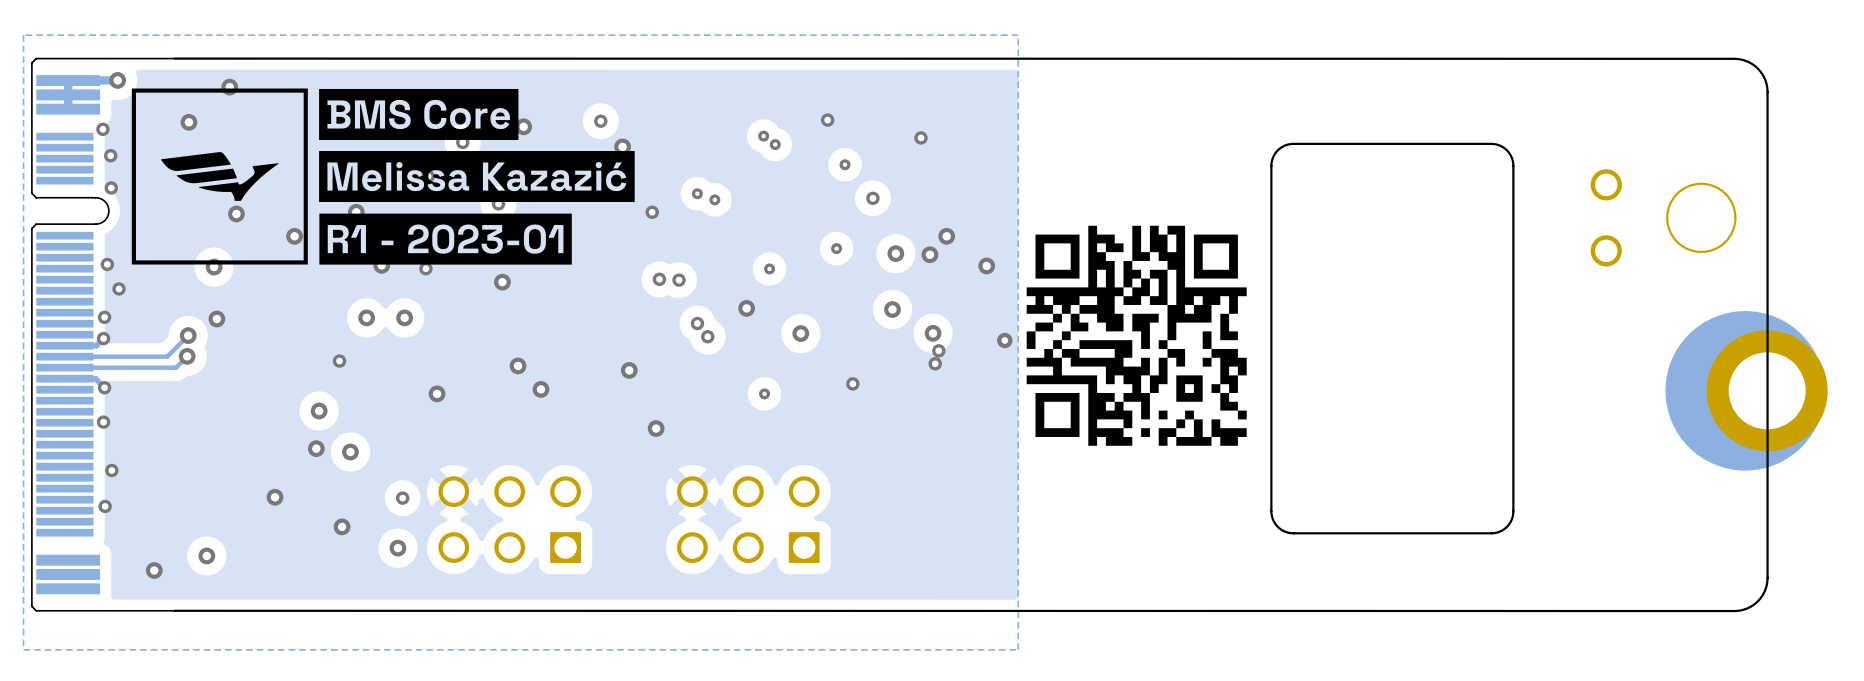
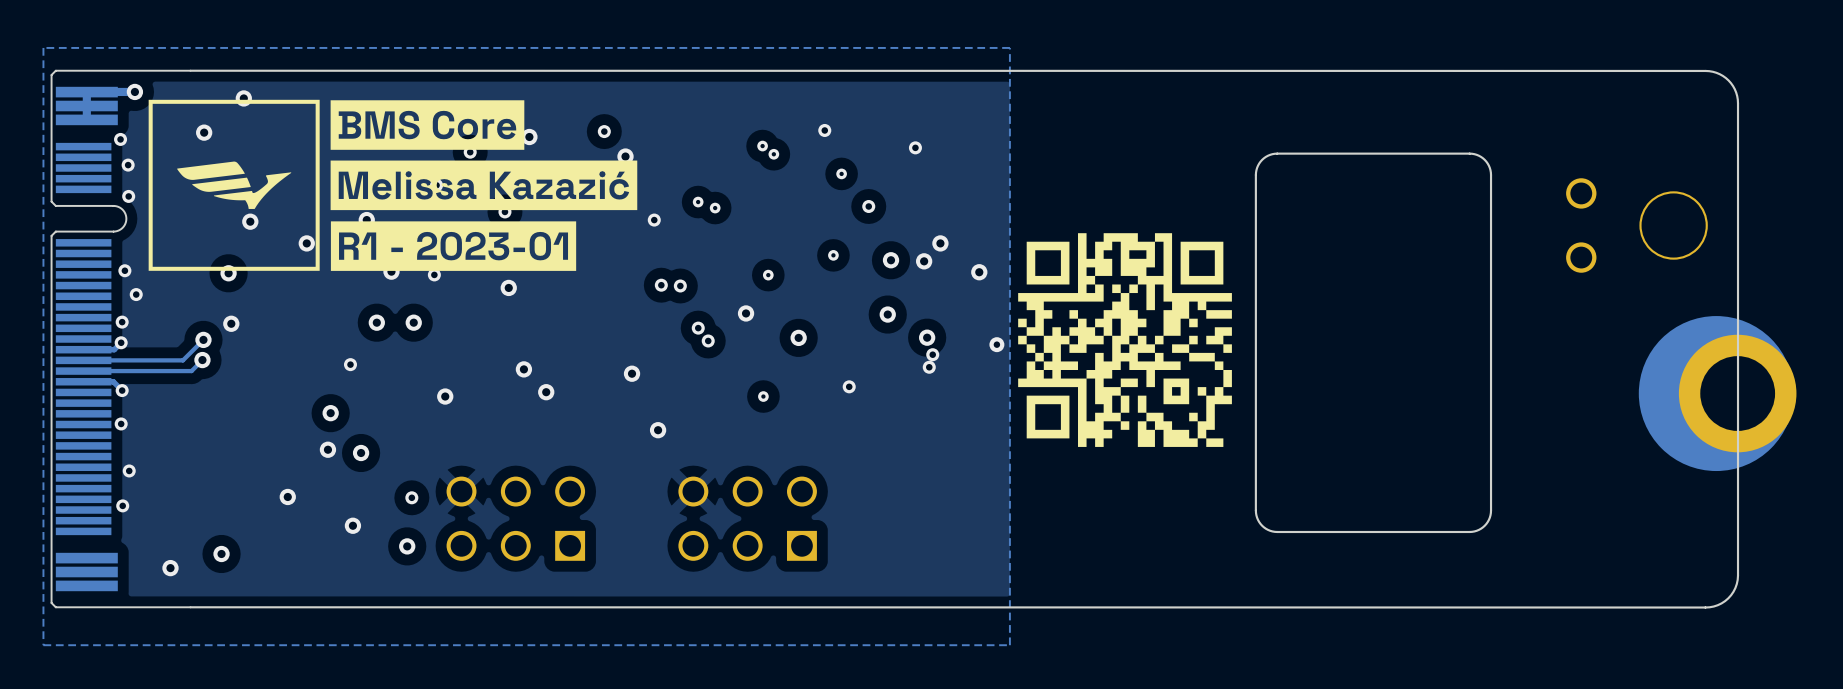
drawing shape: [1026, 225, 1247, 446] -> [1018, 233, 1232, 447]

